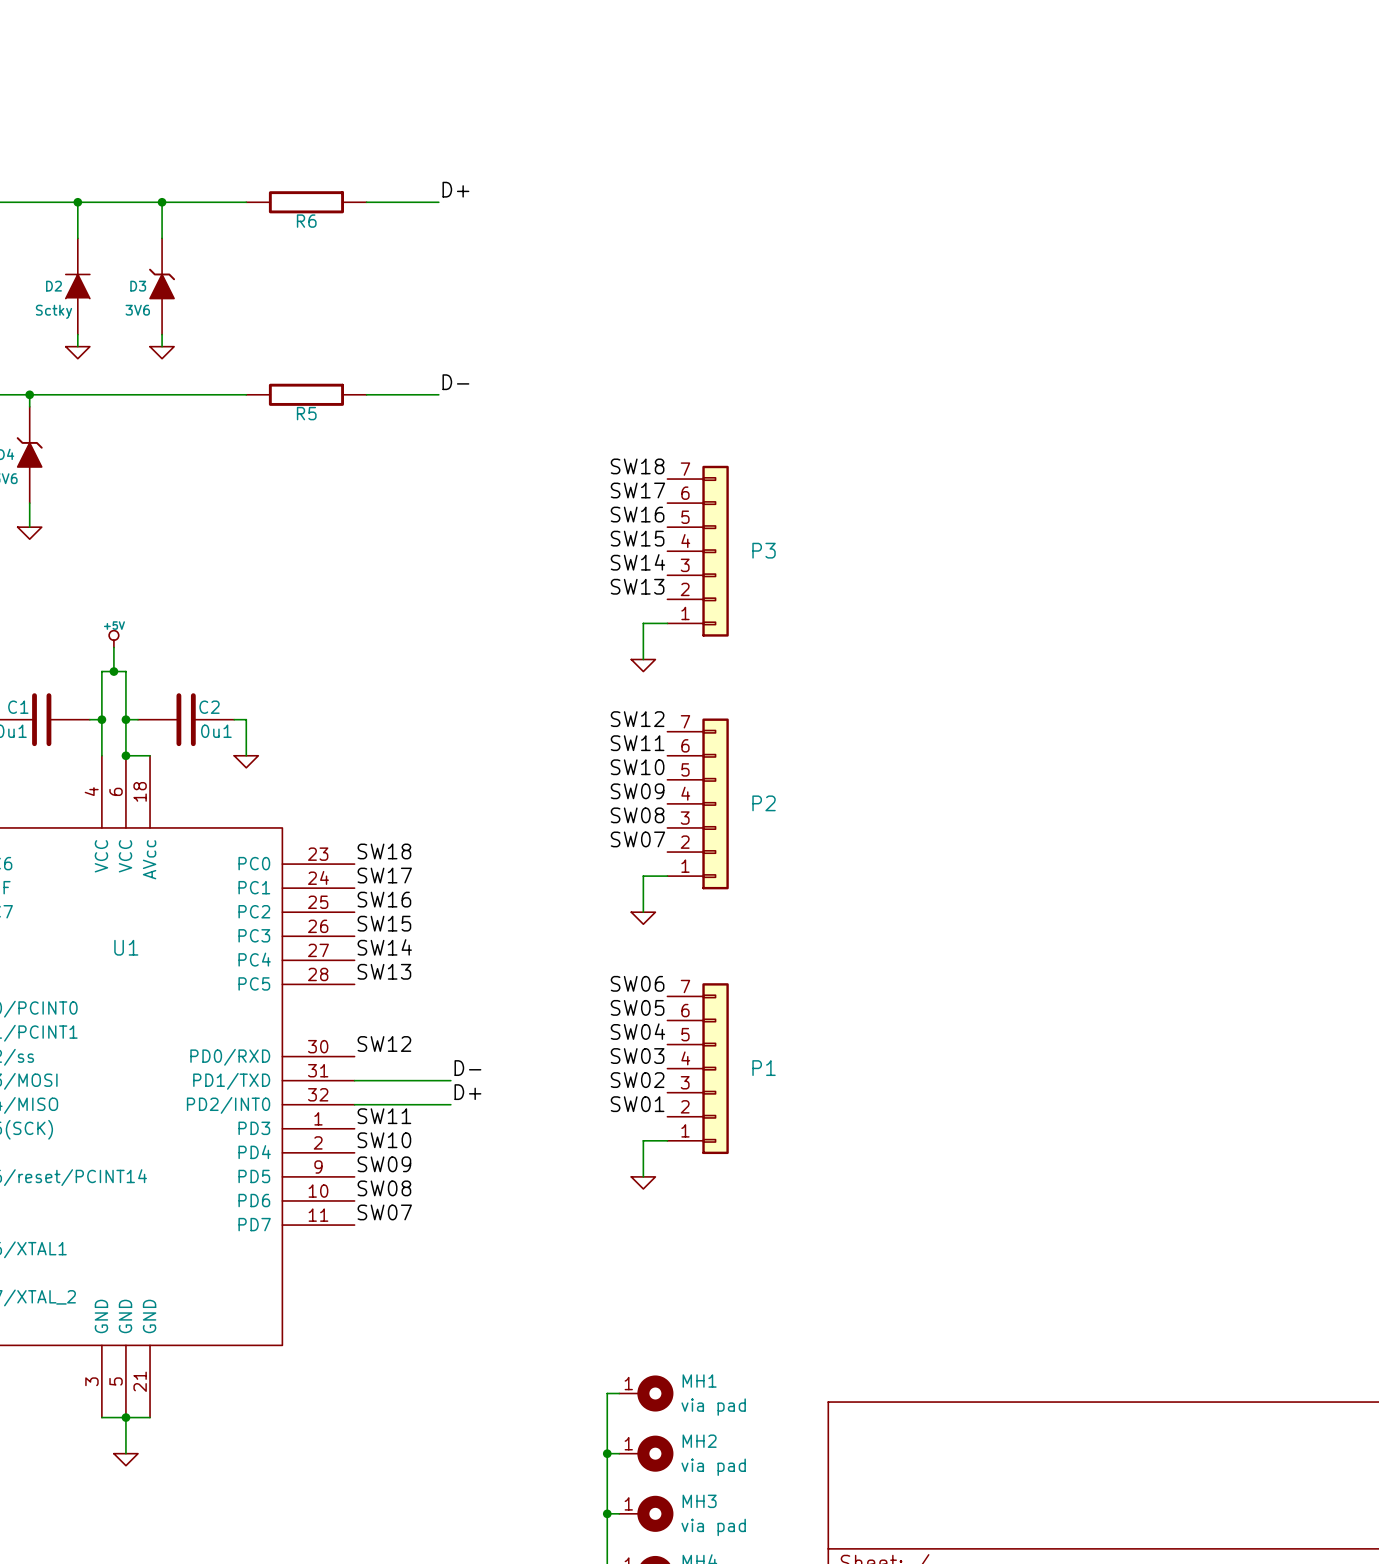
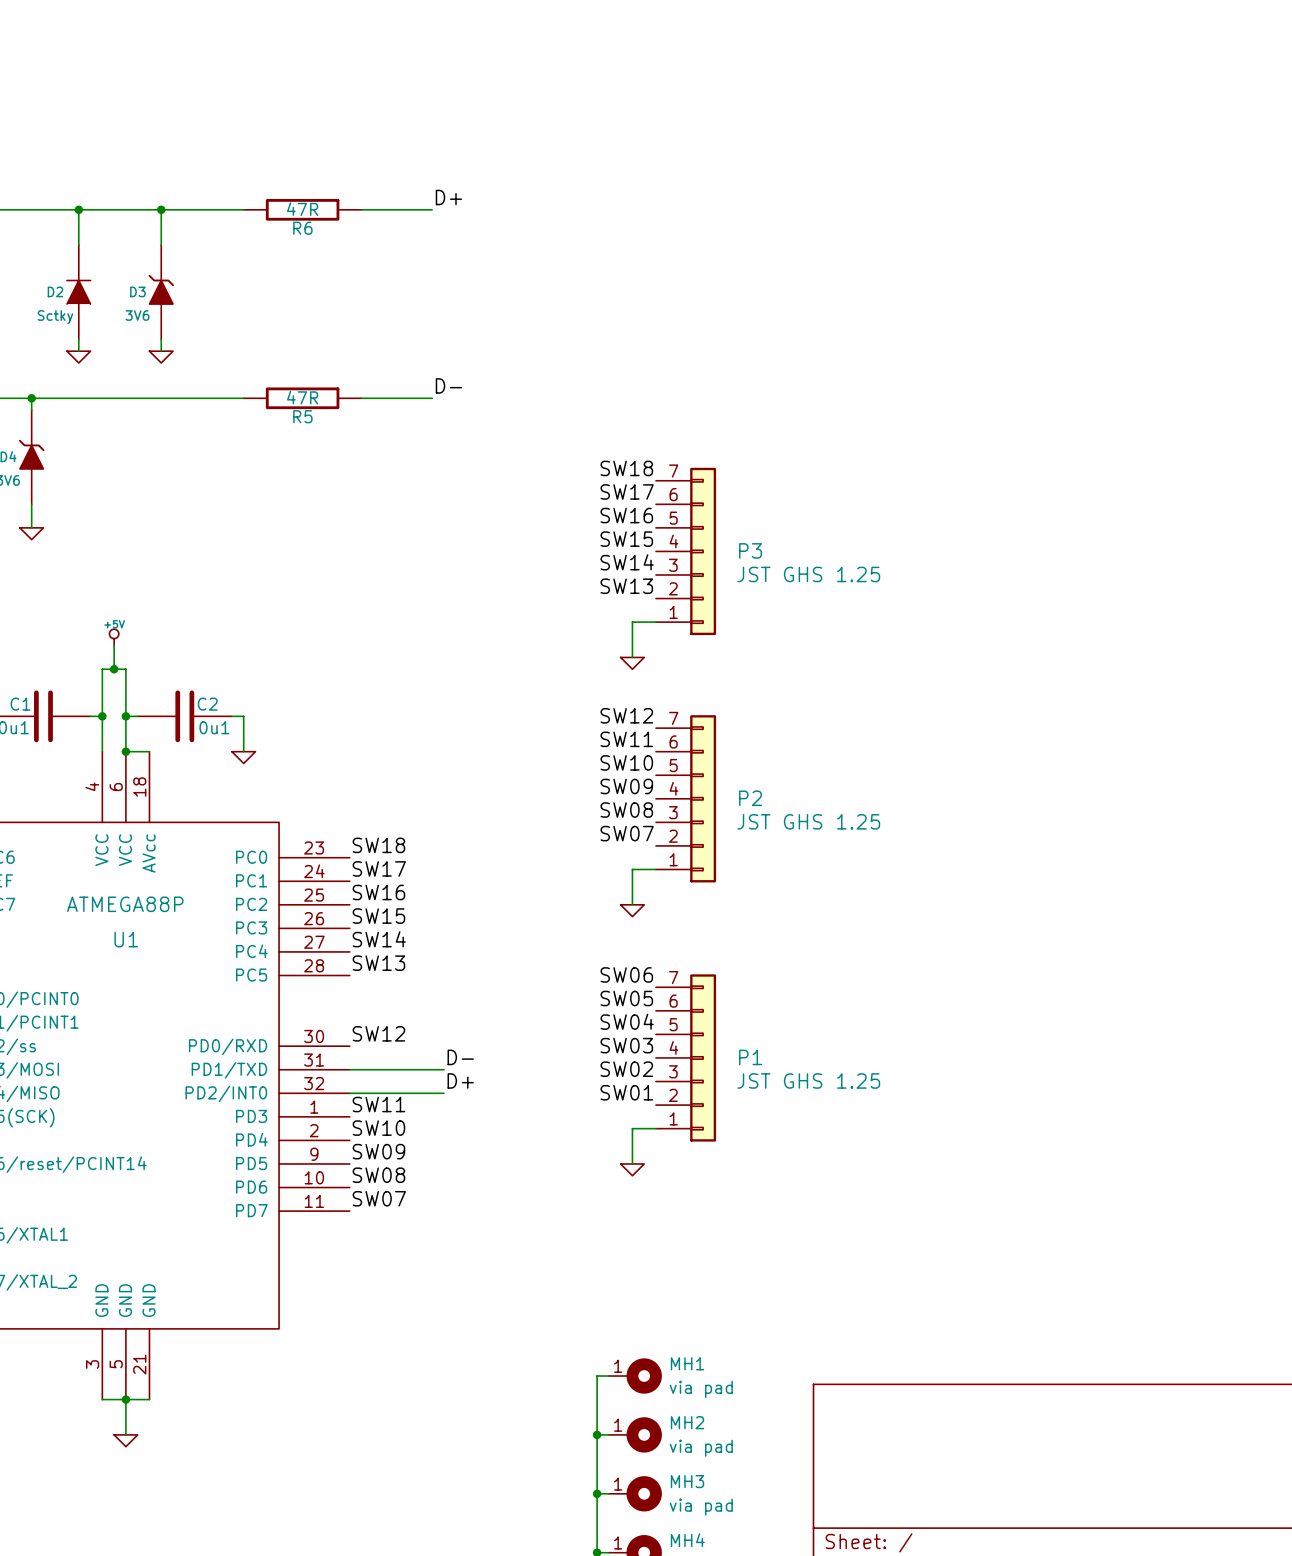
R6 value: none -> 47R (302, 209)
R5 value: none -> 47R (302, 397)
P3 value: none -> JST GHS 1.25 (808, 574)
P2 value: none -> JST GHS 1.25 (808, 821)
U1 value: none -> ATMEGA88P (125, 904)
P1 value: none -> JST GHS 1.25 (808, 1080)

